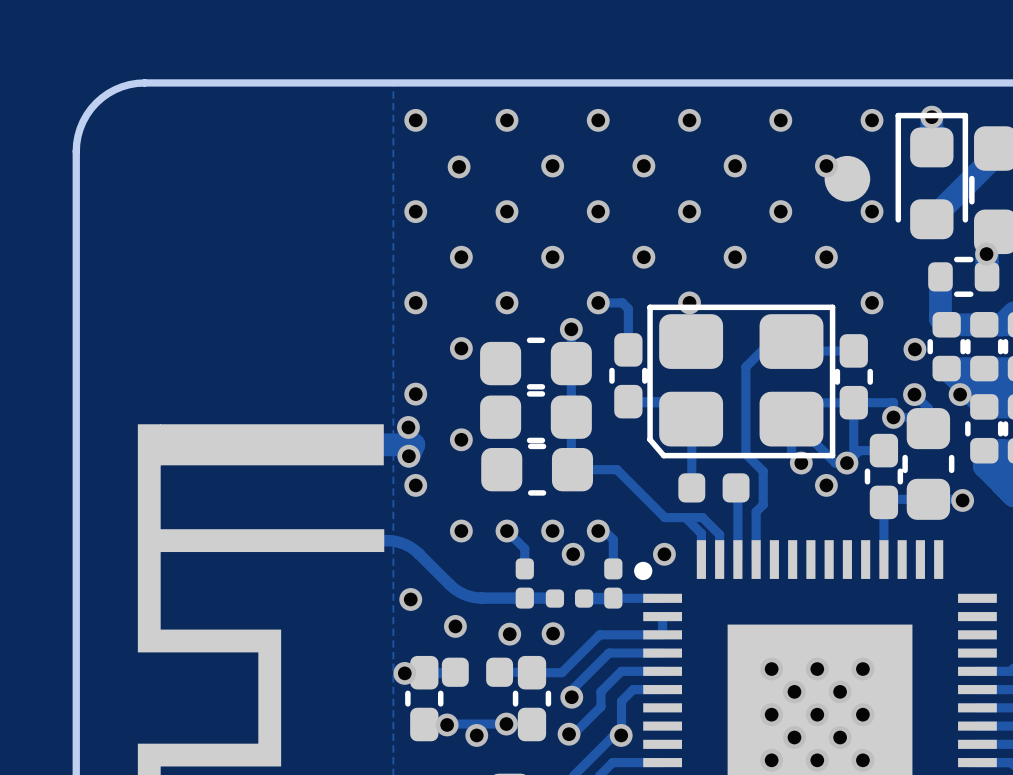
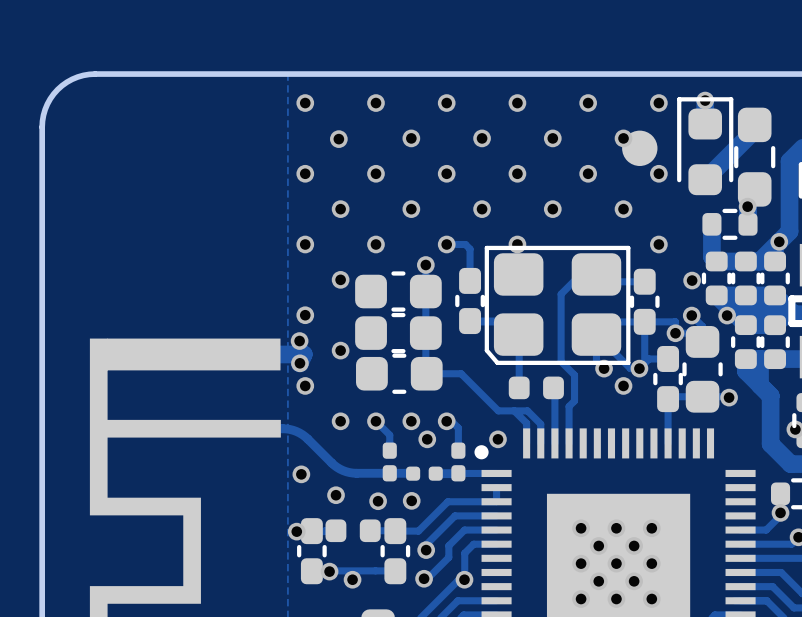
via: (506, 724) -> none

